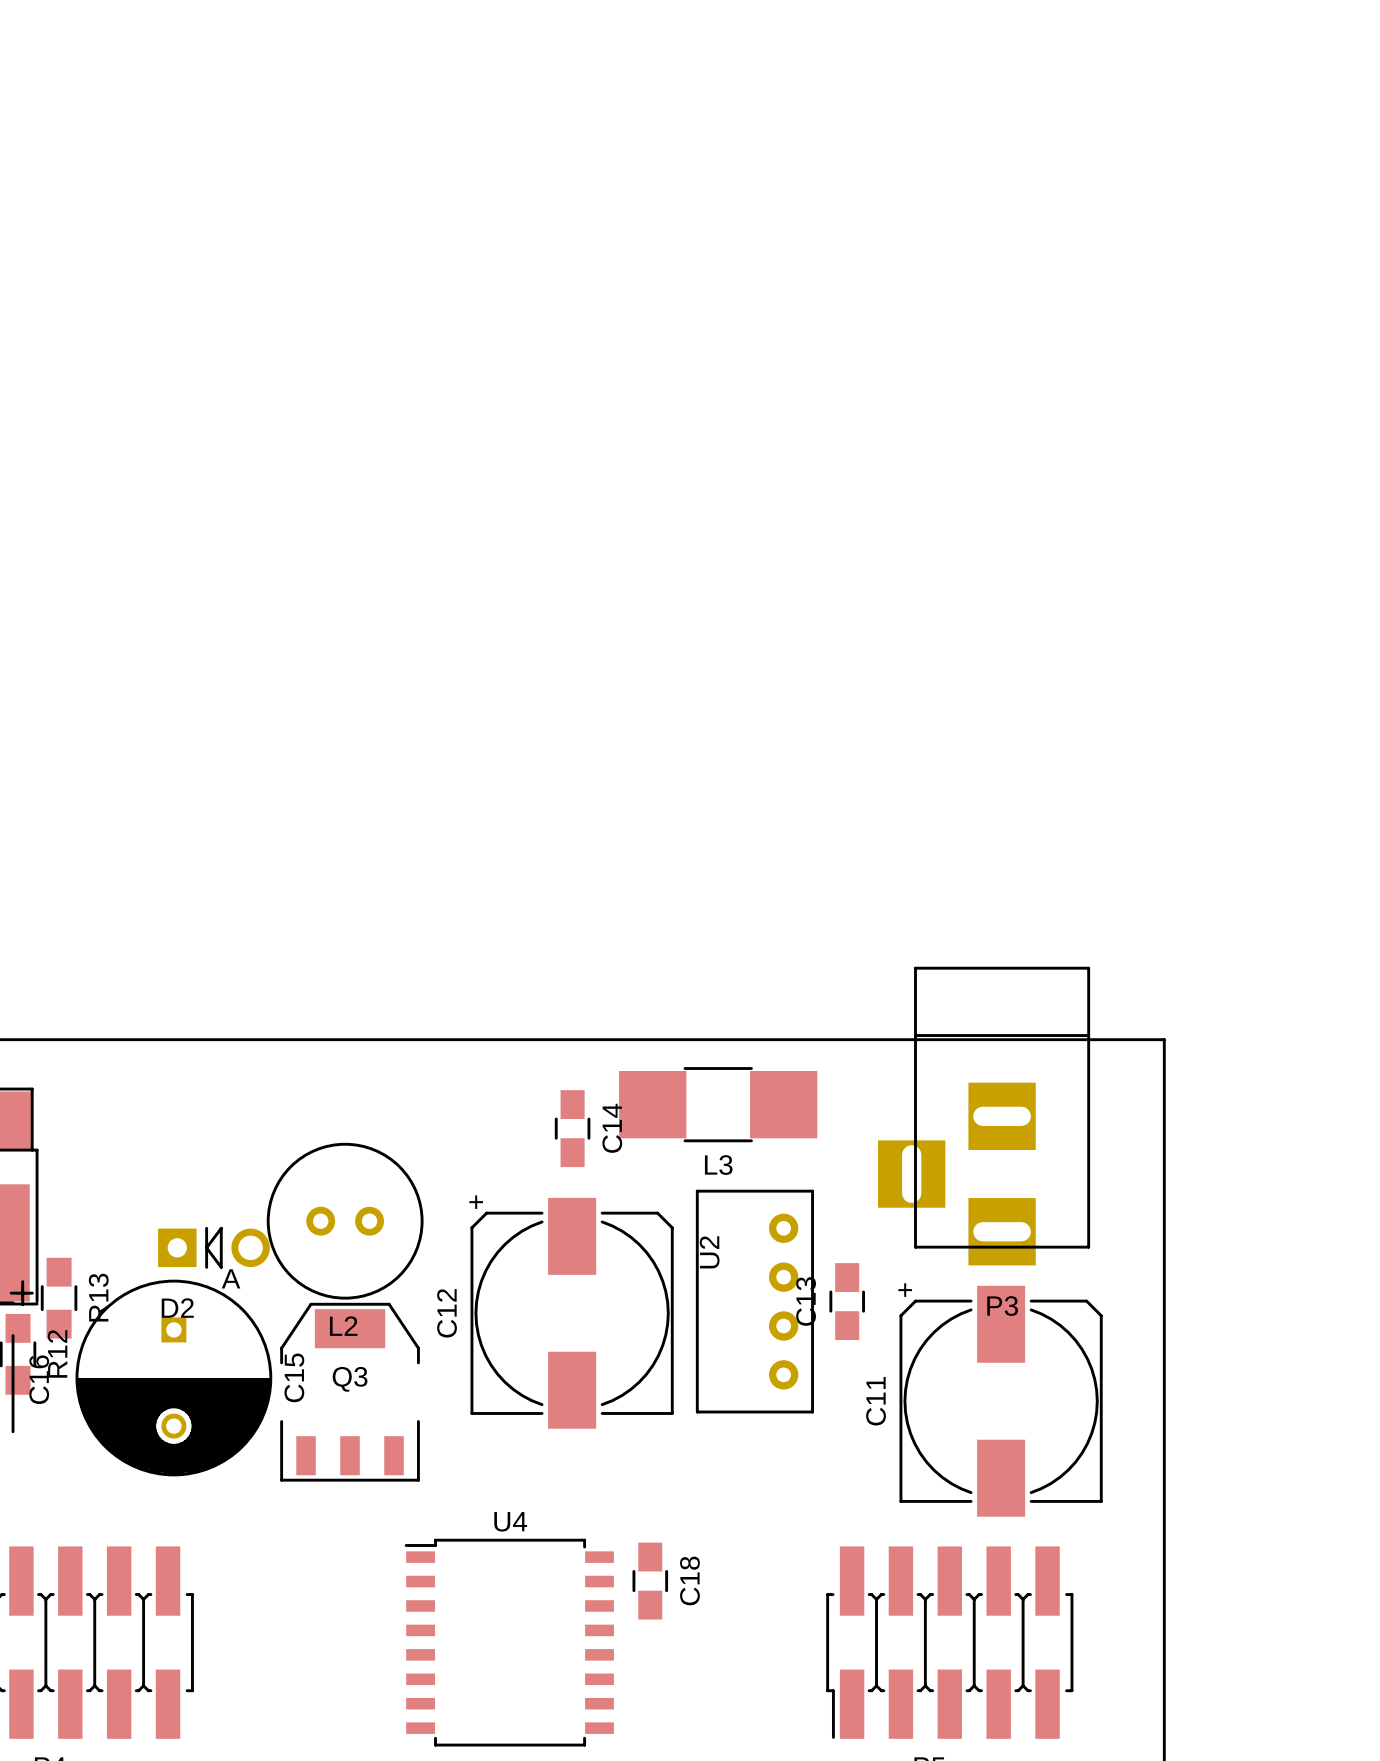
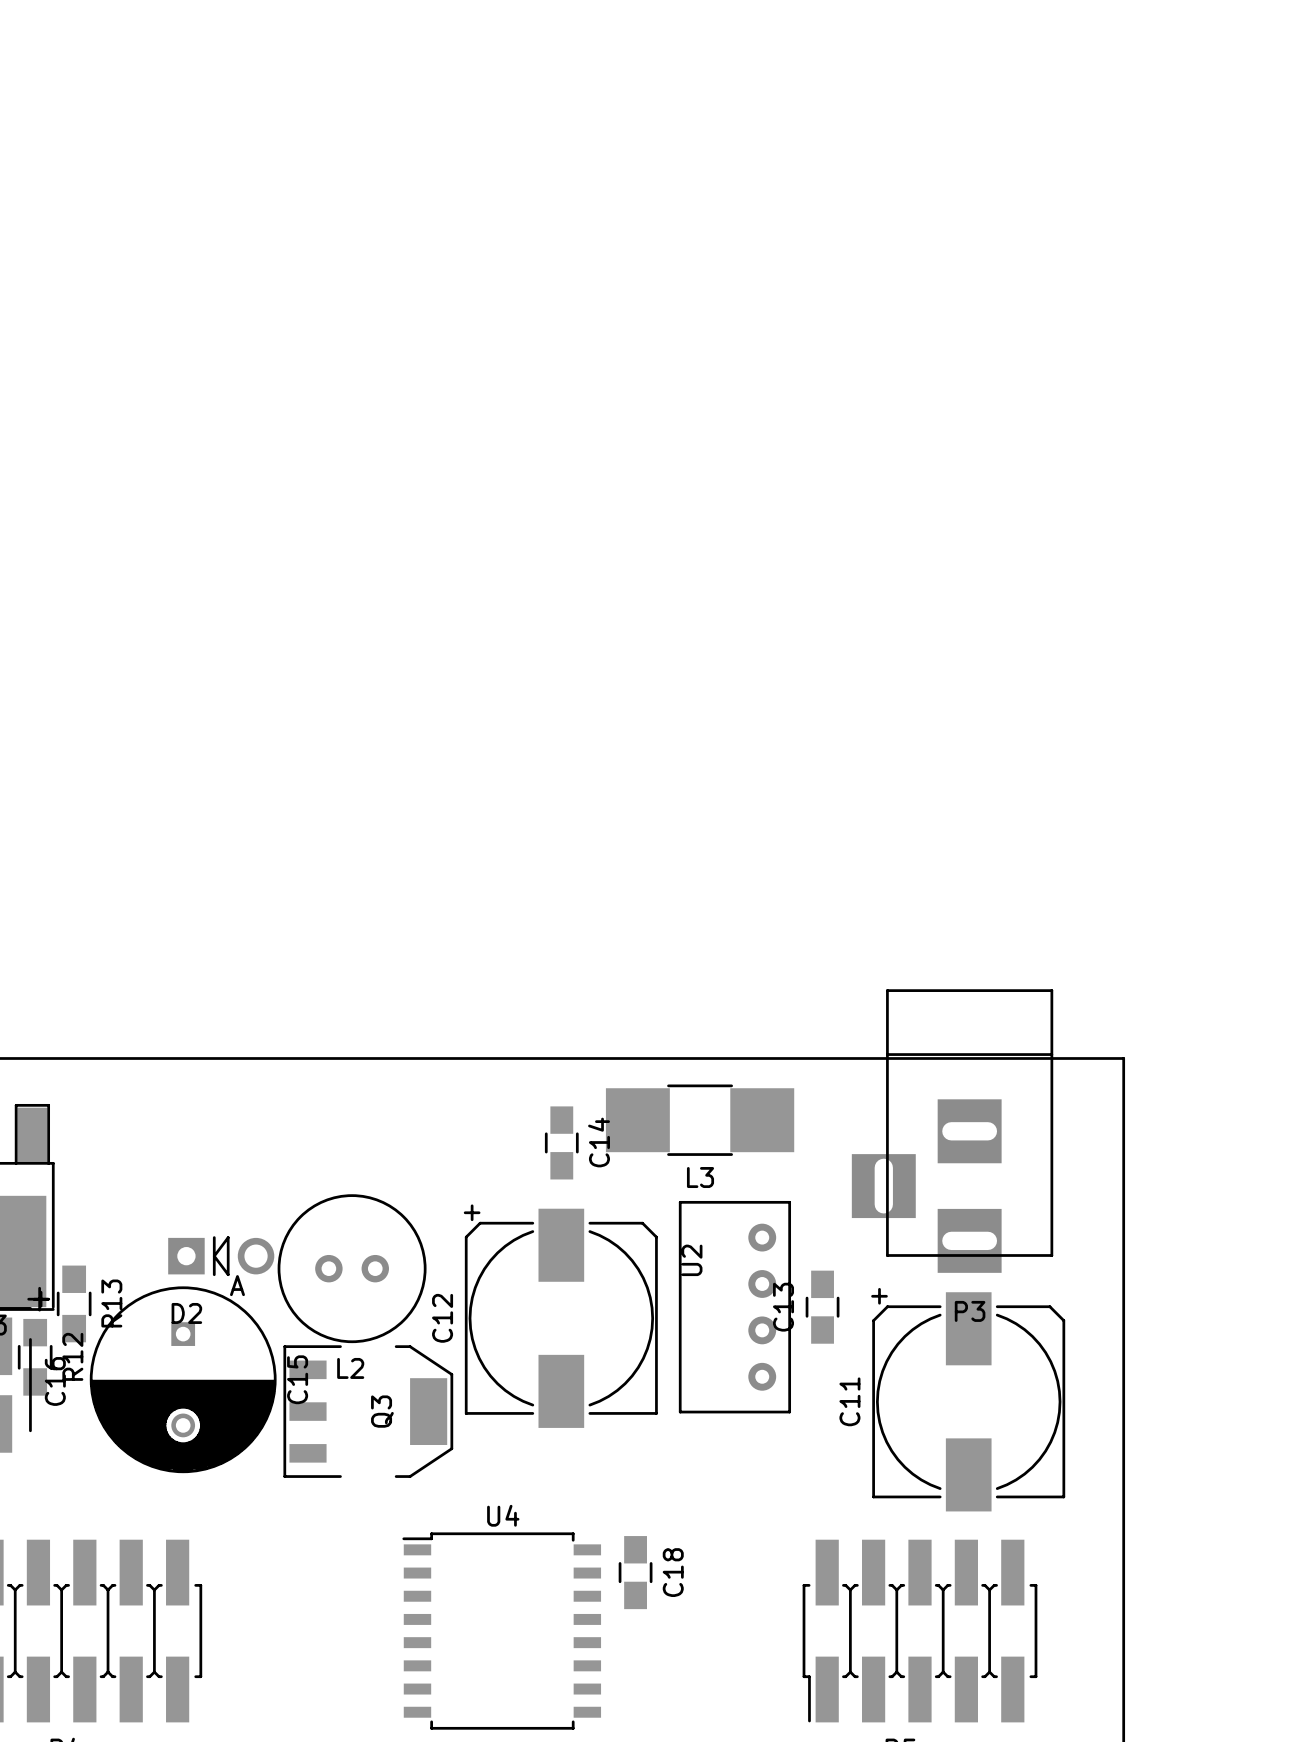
L2 position: (345, 1221) -> (352, 1268)
Q3 rotation: 0° (350, 1392) -> 90° clockwise (368, 1411)

